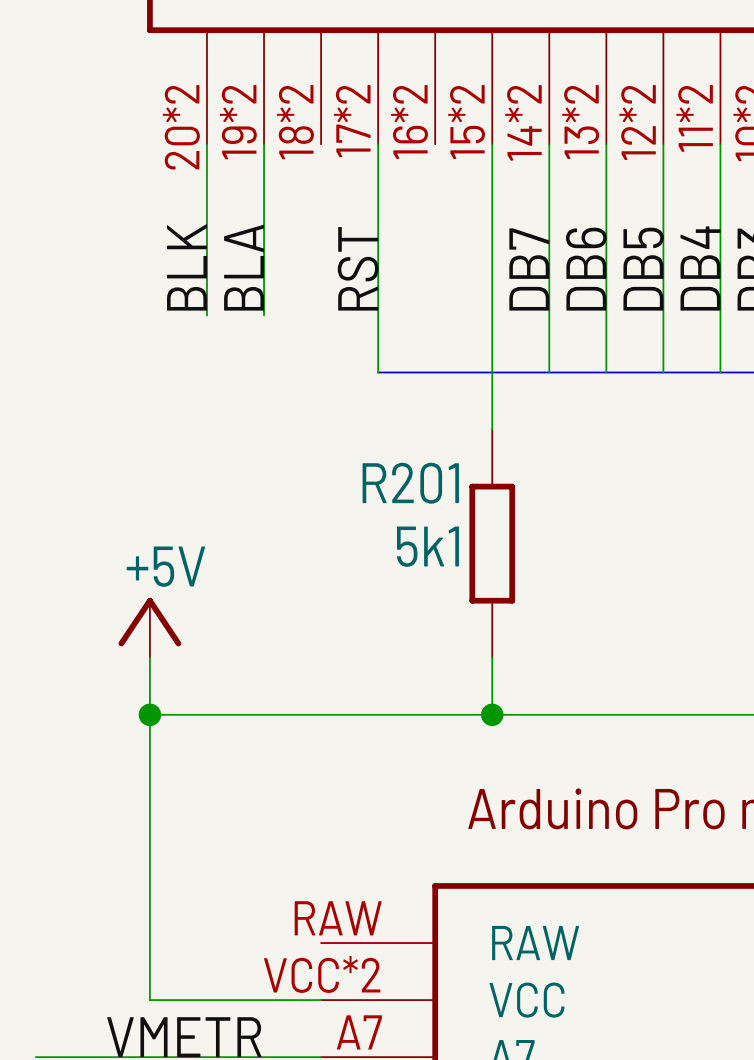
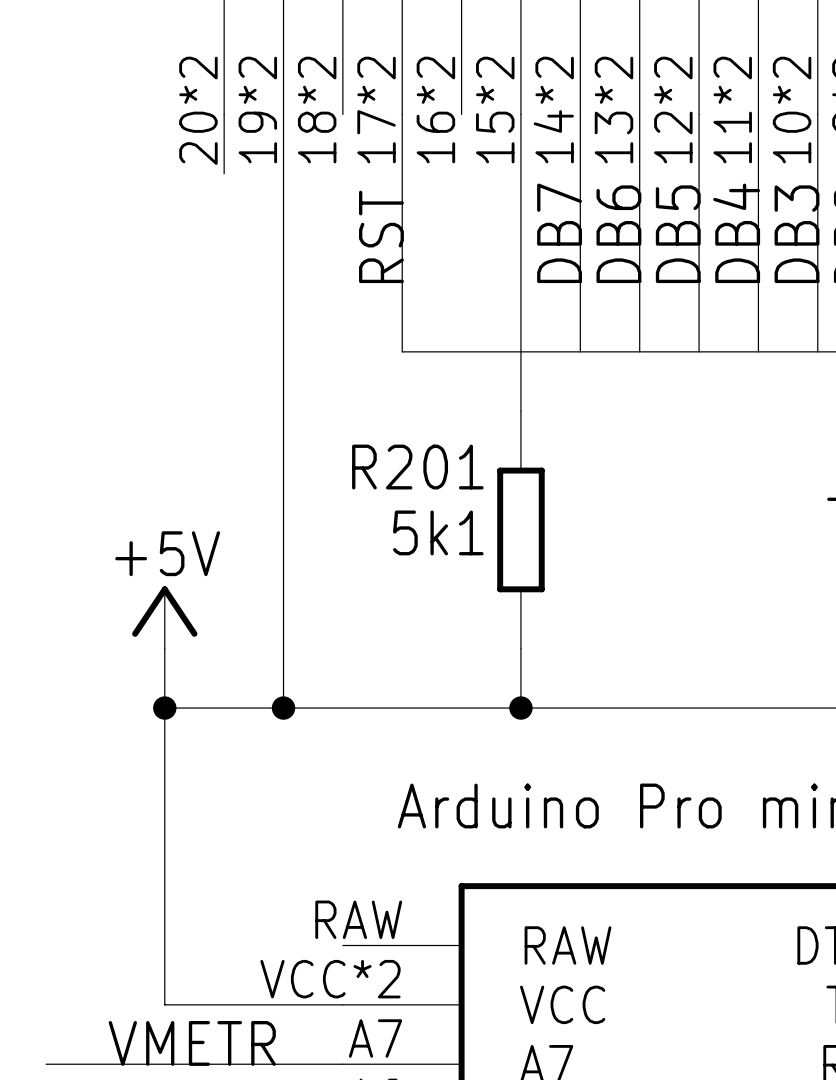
wire: (206, 201) (206, 315) -> none
label: BLK (187, 267) -> none
label: BLA (244, 267) -> none
wire: none -> (283, 292) (283, 708)
junction: none -> (283, 708)

